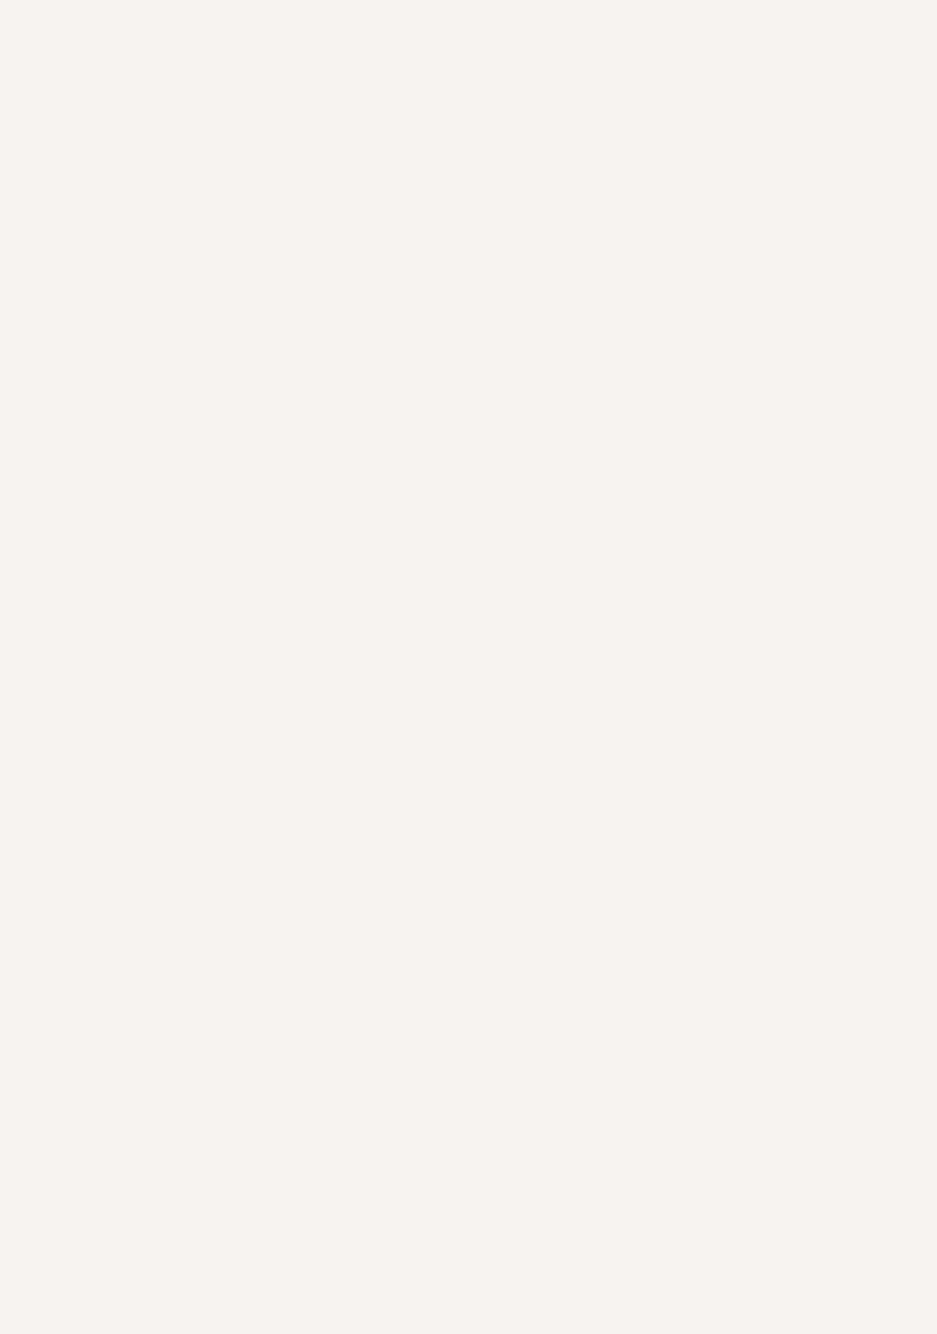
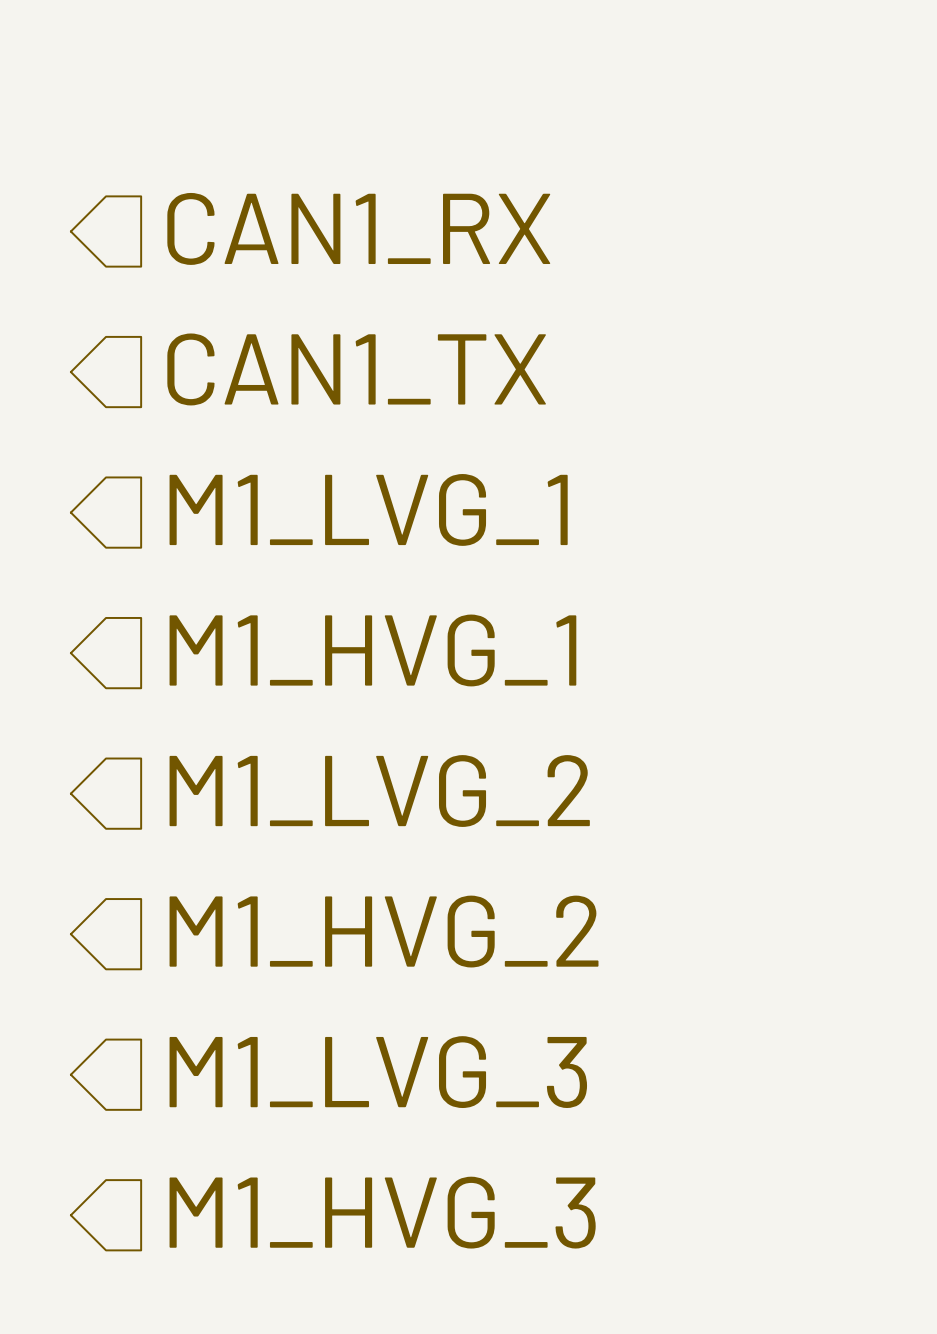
hierarchical label: none -> CAN1_RX (358, 228)
hierarchical label: none -> CAN1_TX (356, 369)
hierarchical label: none -> M1_LVG_1 (368, 509)
hierarchical label: none -> M1_HVG_1 (372, 650)
hierarchical label: none -> M1_LVG_2 (379, 791)
hierarchical label: none -> M1_HVG_2 (384, 931)
hierarchical label: none -> M1_LVG_3 (378, 1072)
hierarchical label: none -> M1_HVG_3 (382, 1212)

